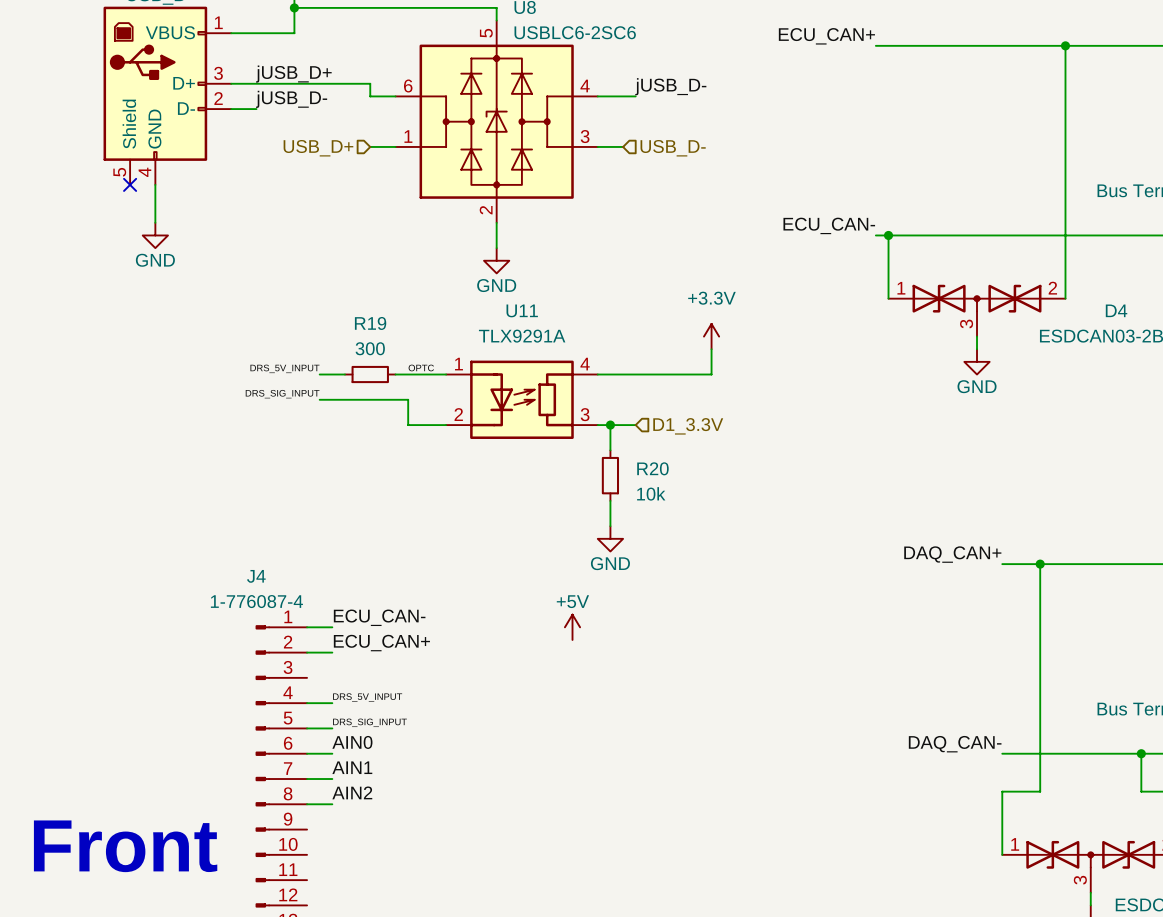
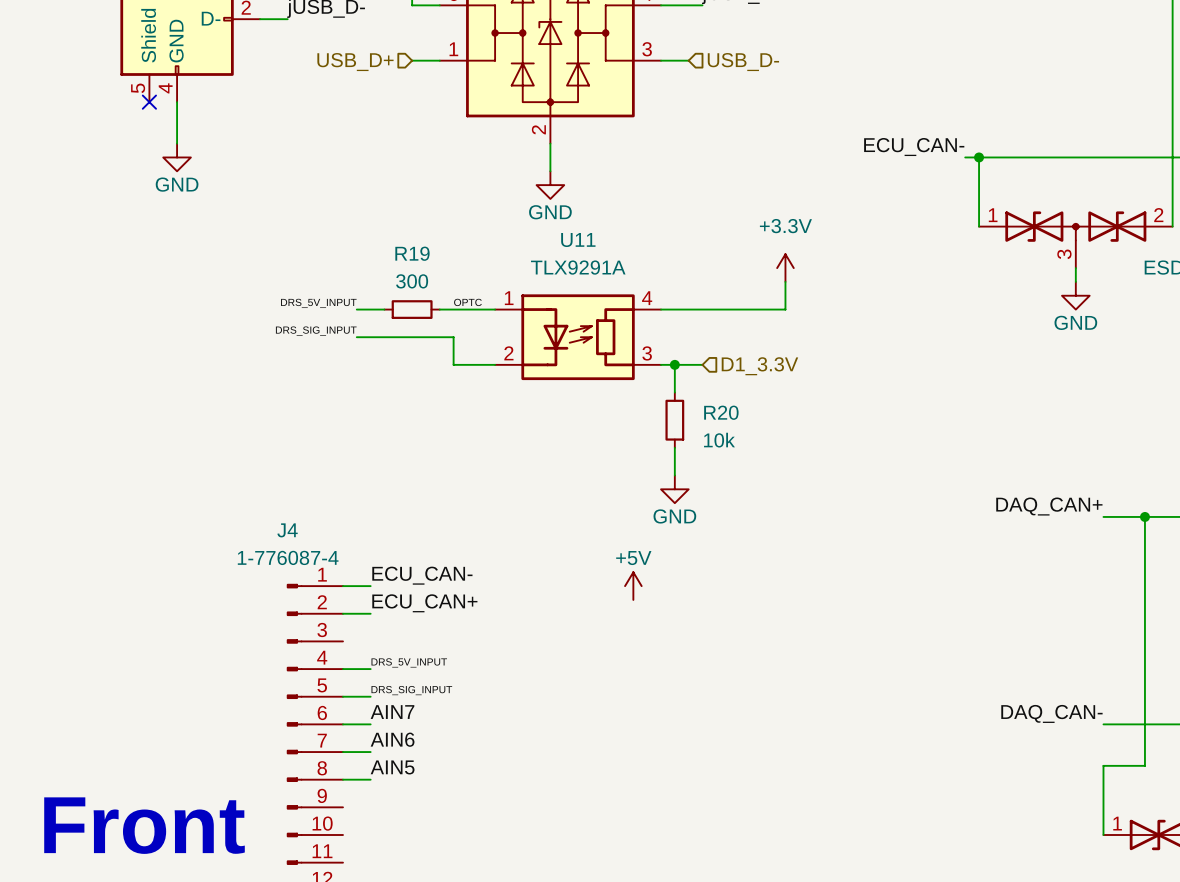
label: AIN0 (352, 742) -> AIN7 (392, 712)
label: AIN1 (352, 767) -> AIN6 (392, 739)
label: AIN2 (352, 792) -> AIN5 (392, 767)

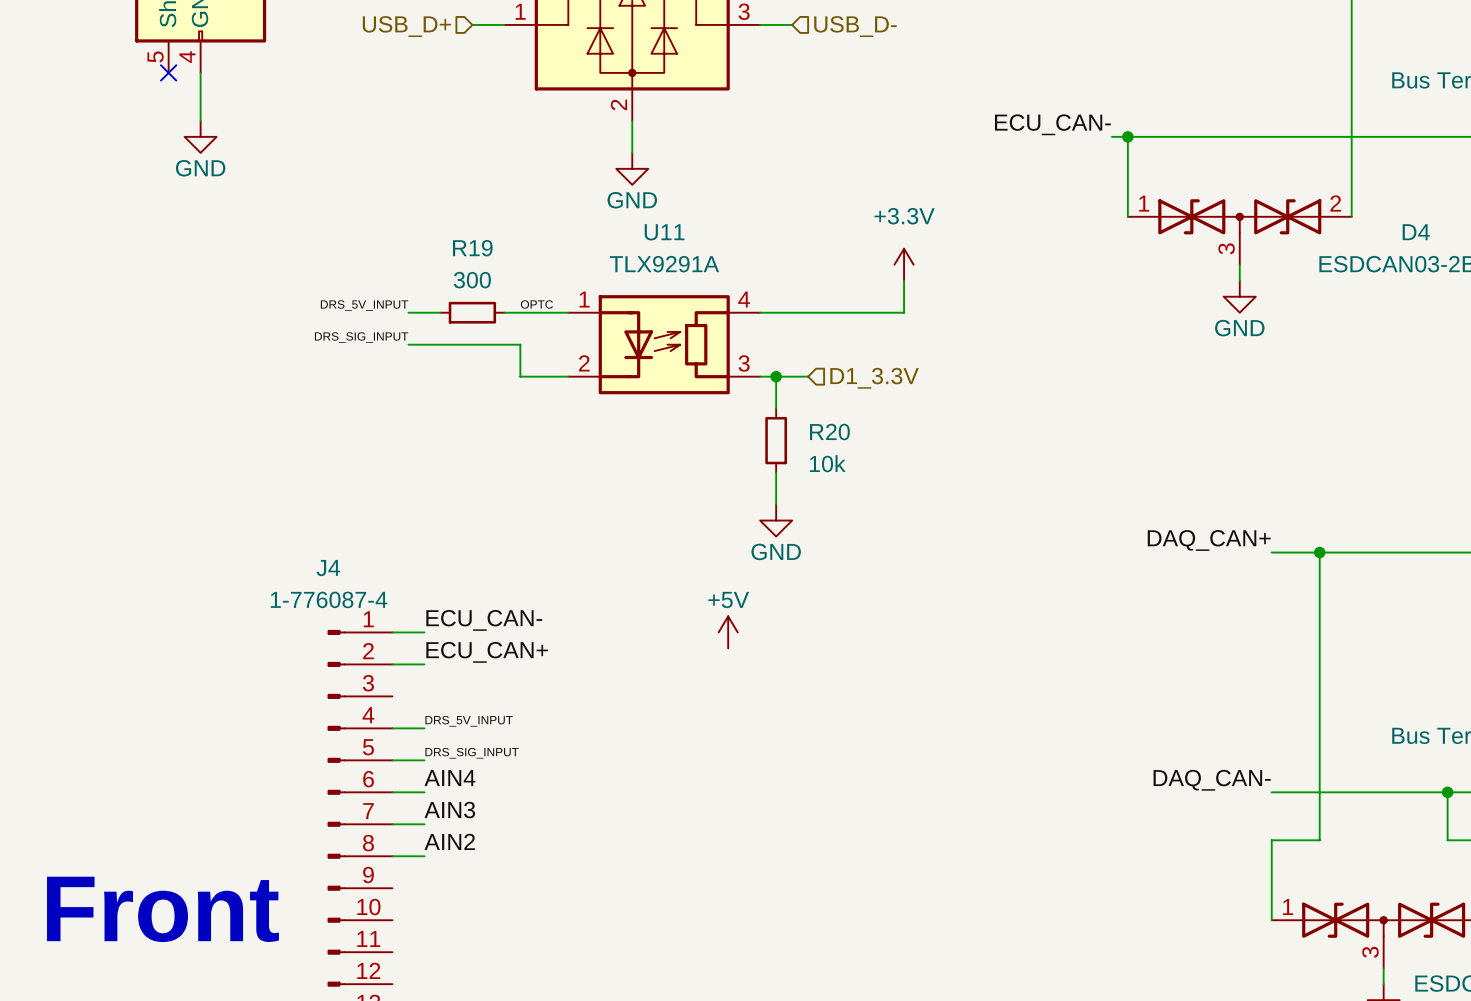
label: AIN7 (392, 712) -> AIN4 (449, 778)
label: AIN6 (392, 739) -> AIN3 (449, 810)
label: AIN5 (392, 767) -> AIN2 (449, 841)

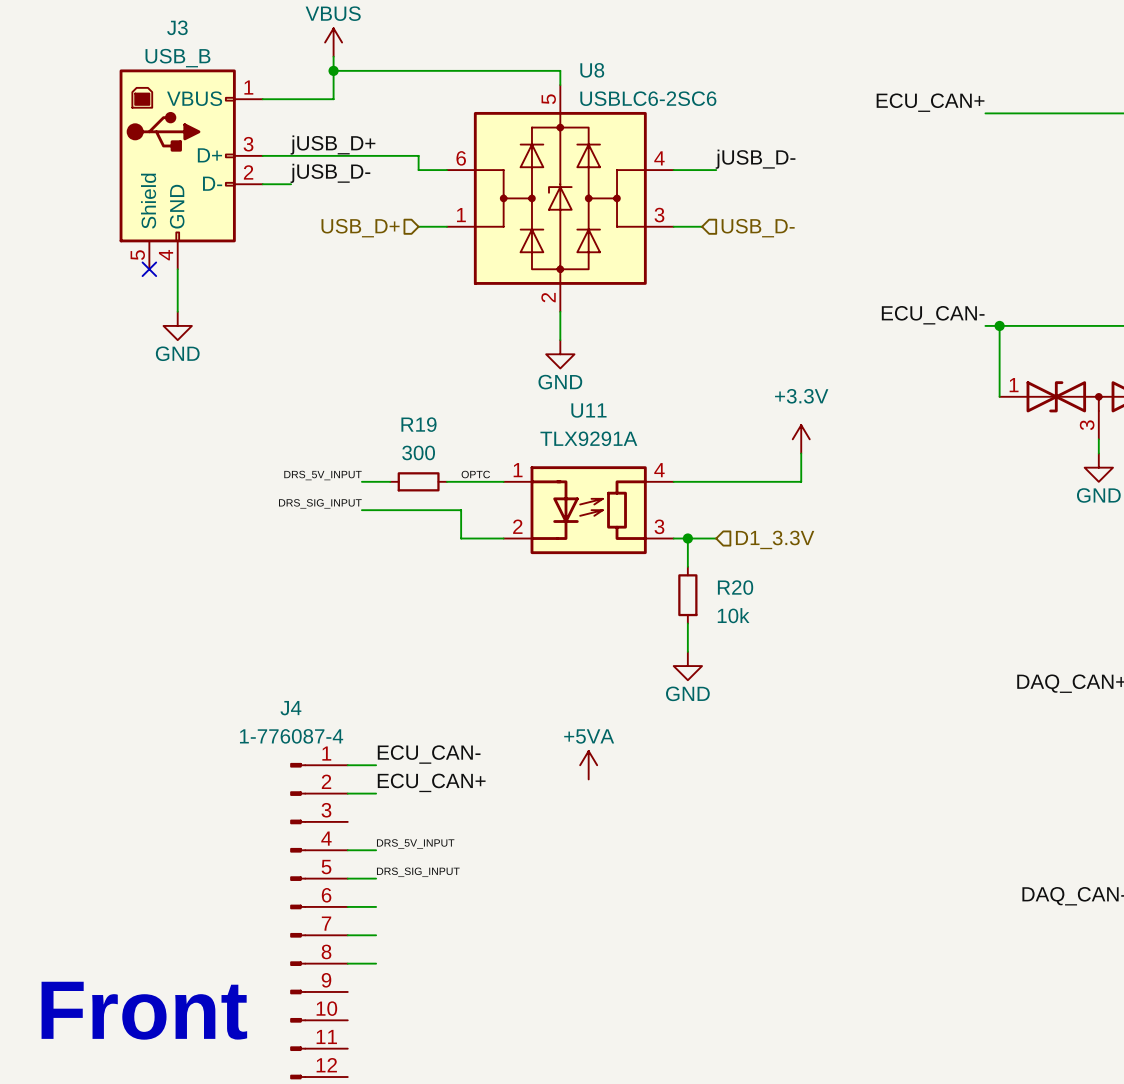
power symbol: none -> +5VA (588, 765)
power symbol: +5V (728, 632) -> none
label: AIN4 (449, 778) -> none
label: AIN3 (449, 810) -> none
label: AIN2 (449, 841) -> none

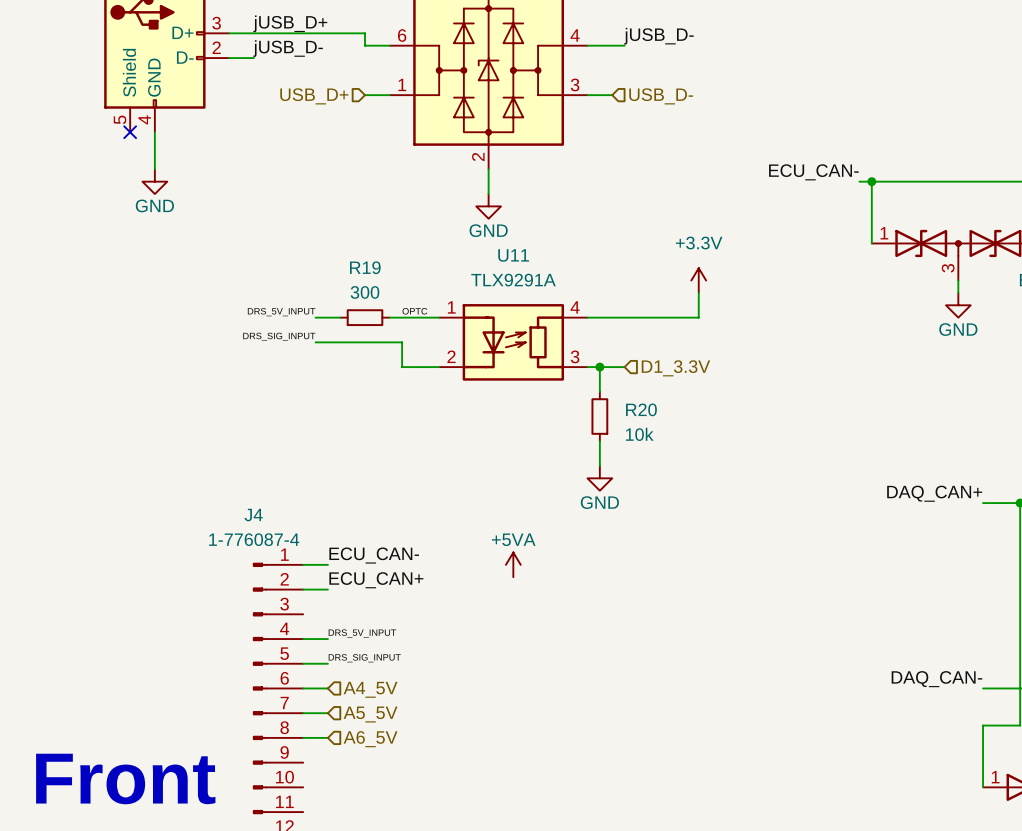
hierarchical label: none -> A4_5V (370, 689)
hierarchical label: none -> A5_5V (370, 714)
hierarchical label: none -> A6_5V (370, 739)

